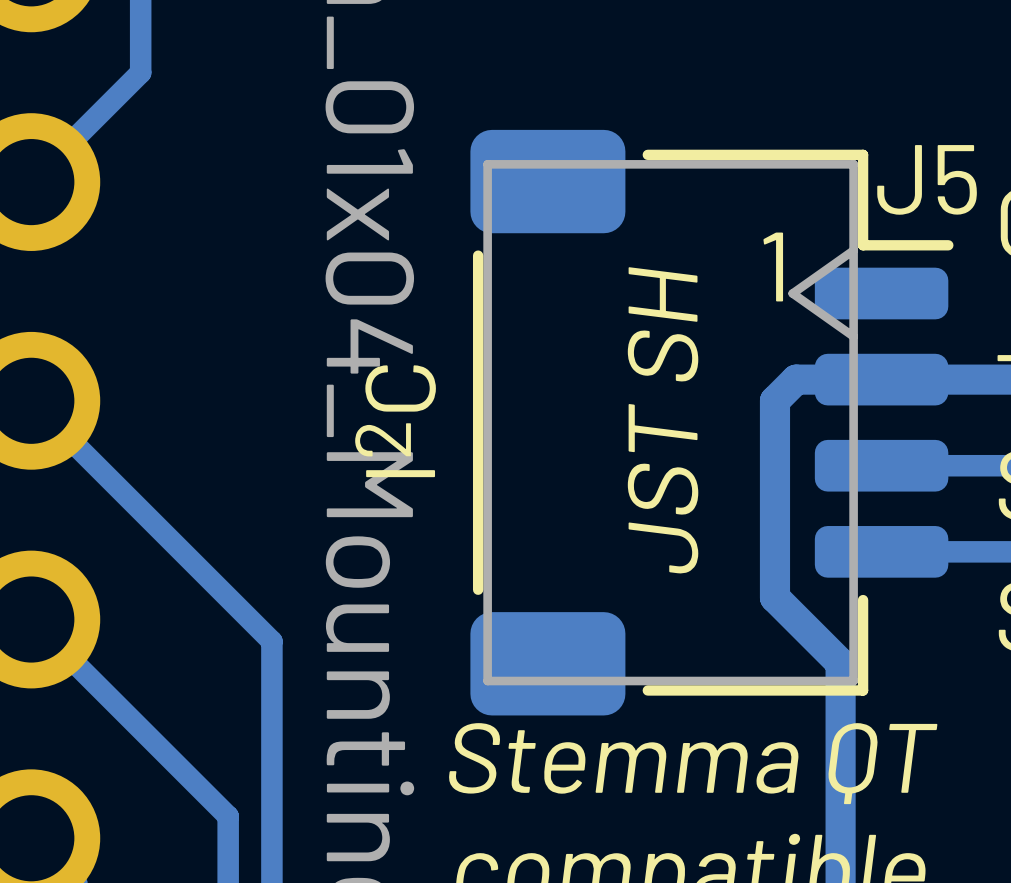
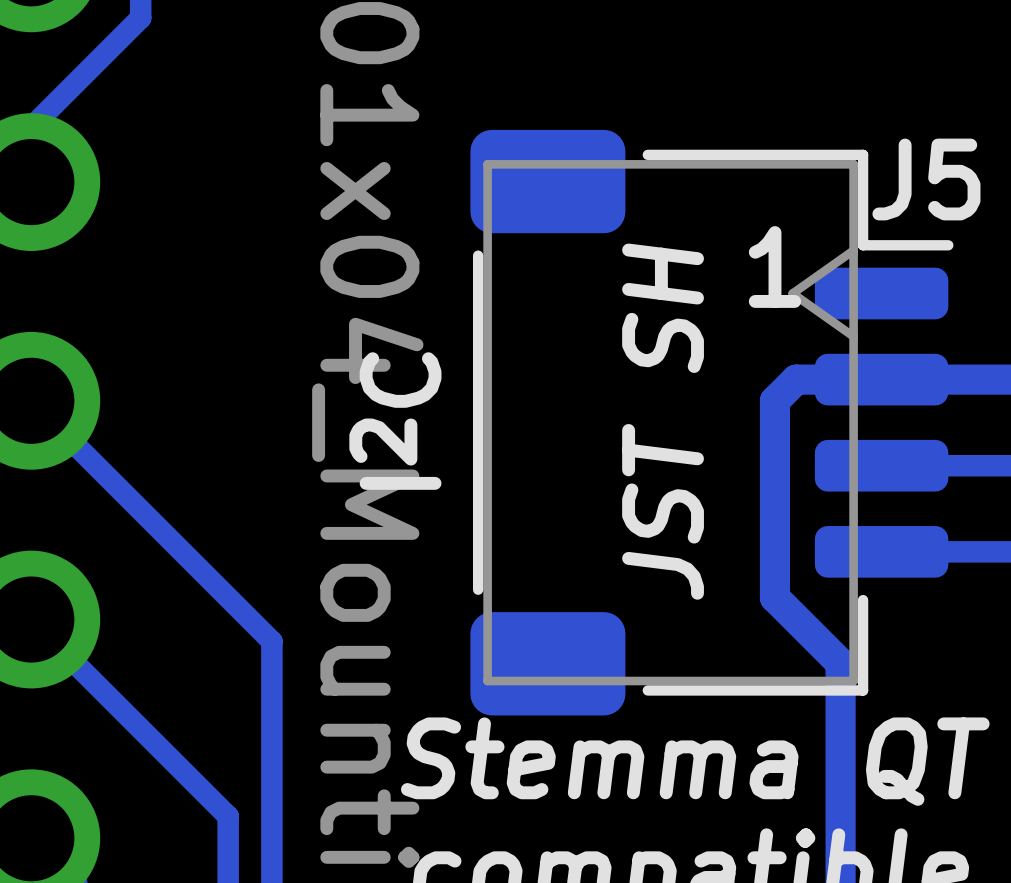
track: (140, 18) (140, 72) (31, 182) -> (140, 18) (31, 127) (31, 182)

